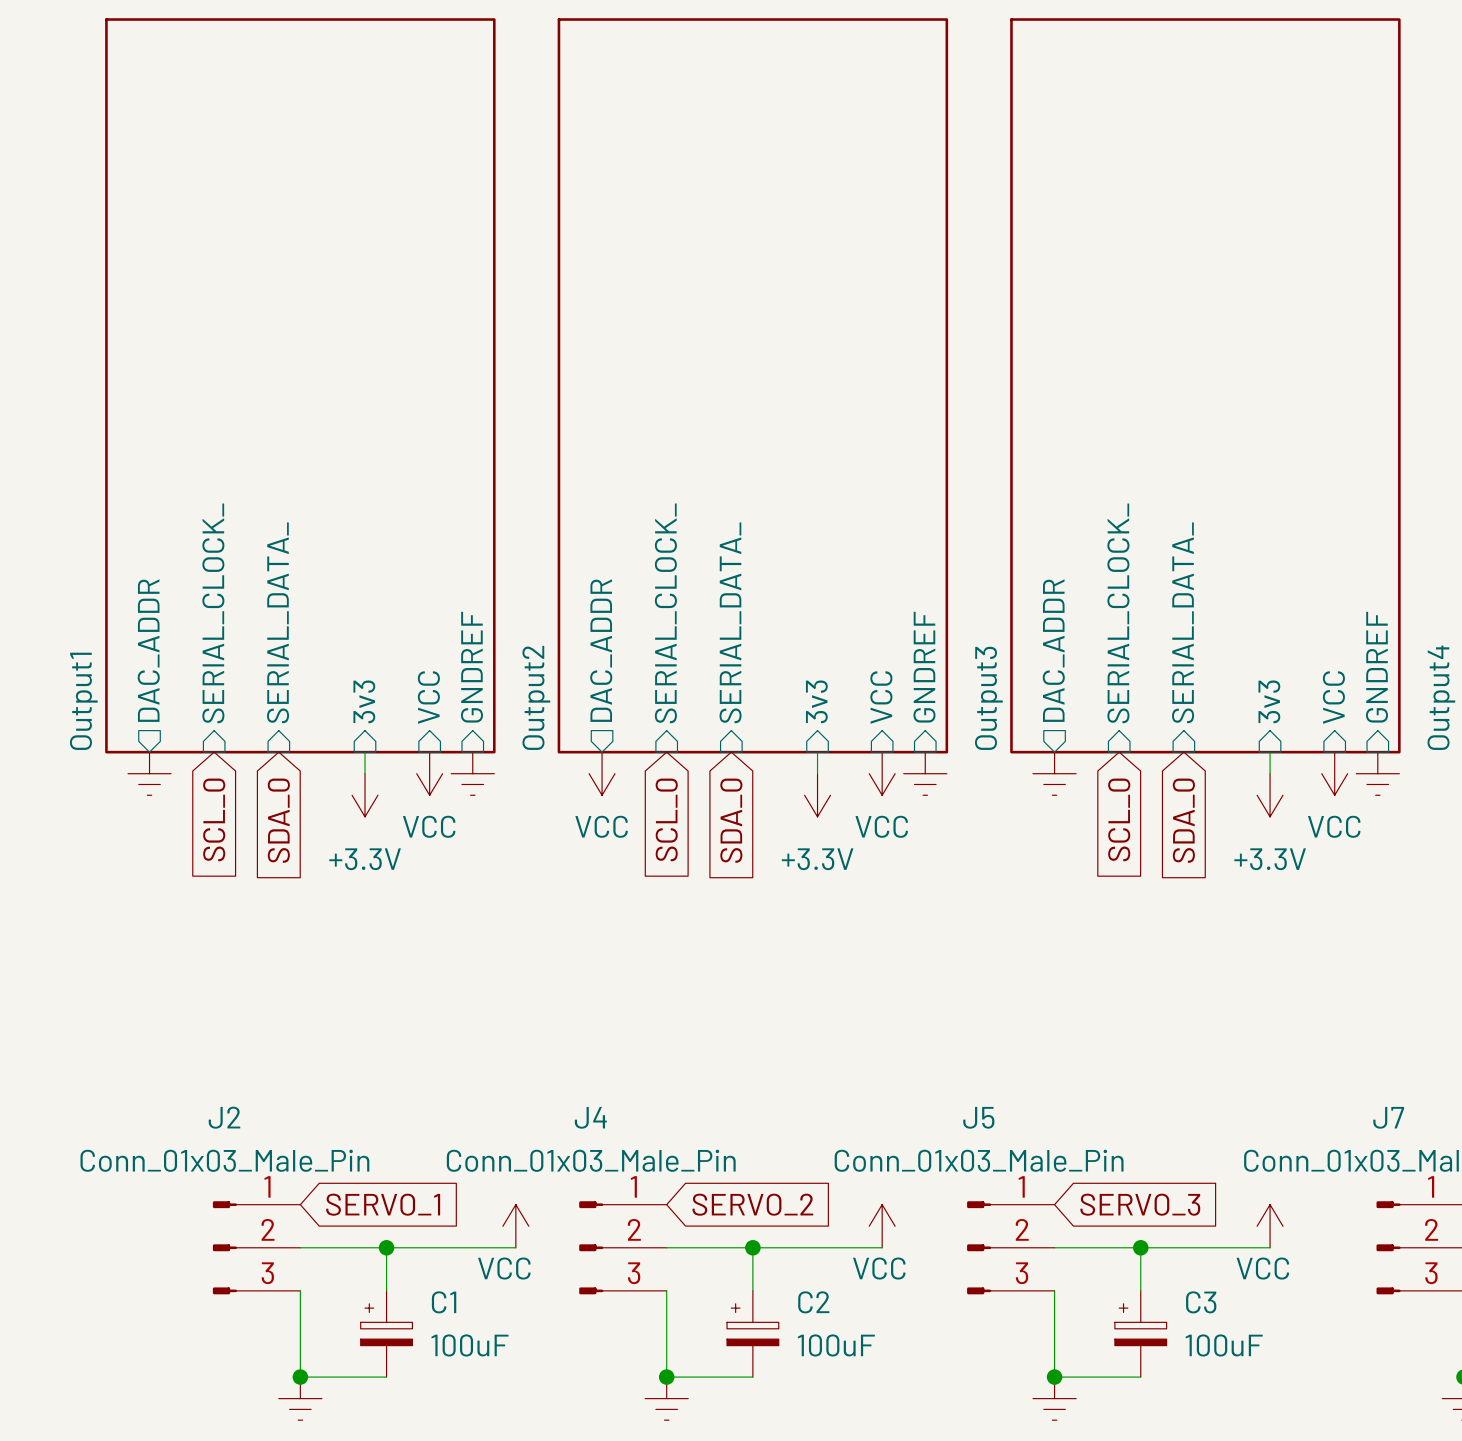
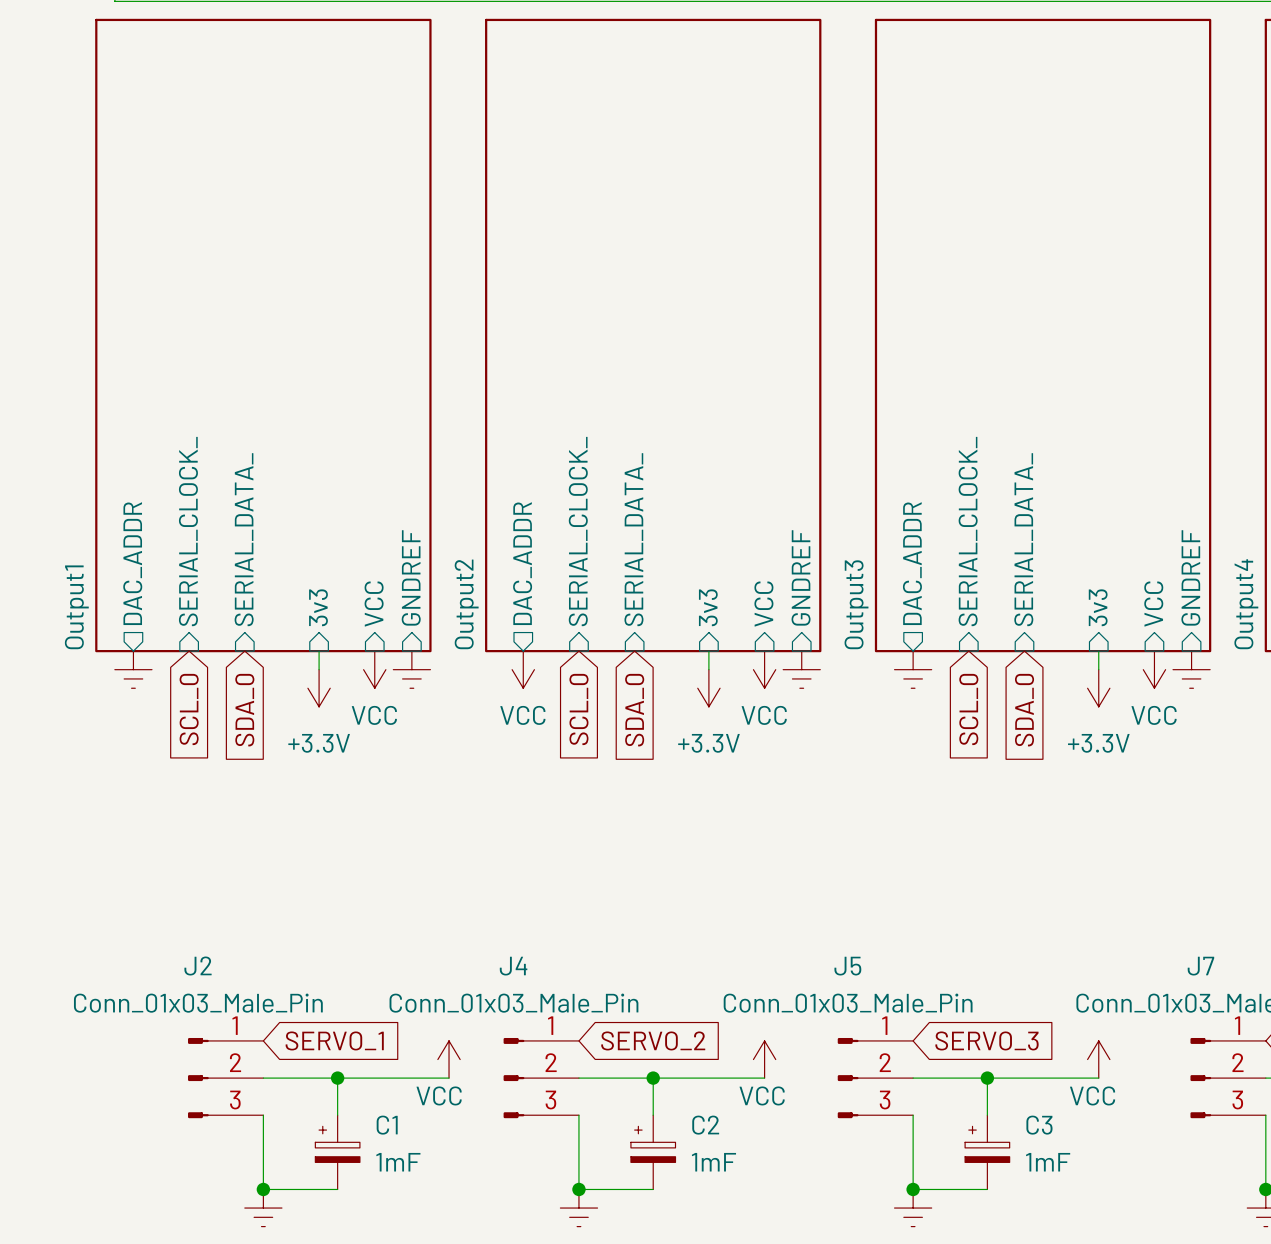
C1 value: 100uF (469, 1345) -> 1mF (398, 1162)
C2 value: 100uF (836, 1345) -> 1mF (713, 1162)
C3 value: 100uF (1224, 1345) -> 1mF (1048, 1162)

